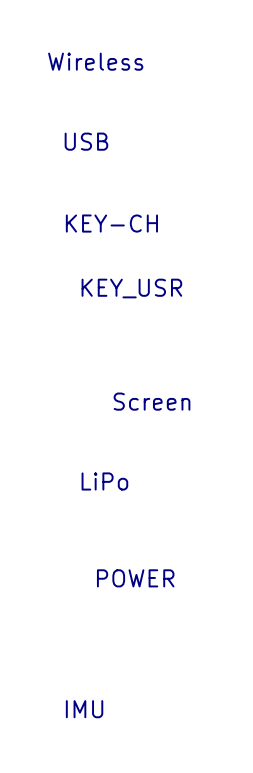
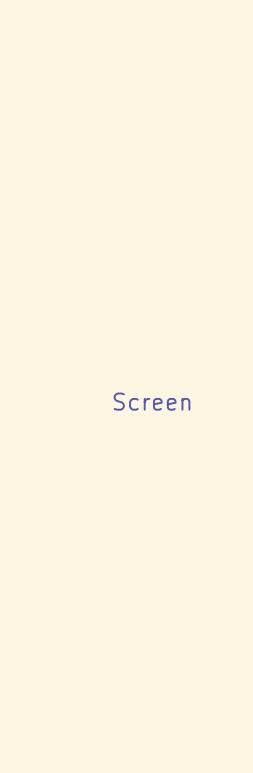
text: Wireless (95, 61) -> none
text: USB (86, 141) -> none
text: KEY-CH (111, 223) -> none
text: KEY_USR (131, 288) -> none
text: LiPo (104, 481) -> none
text: POWER (135, 578) -> none
text: IMU (84, 709) -> none

